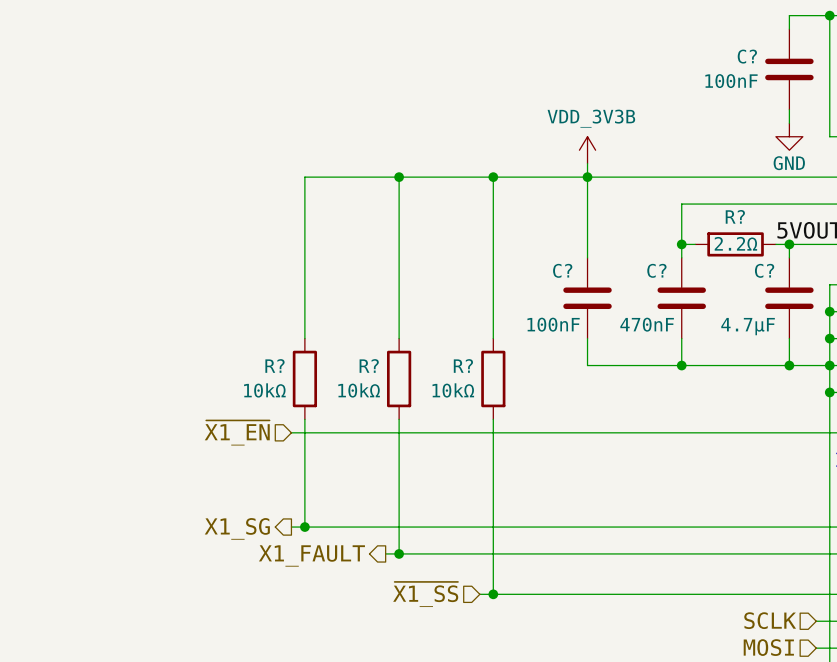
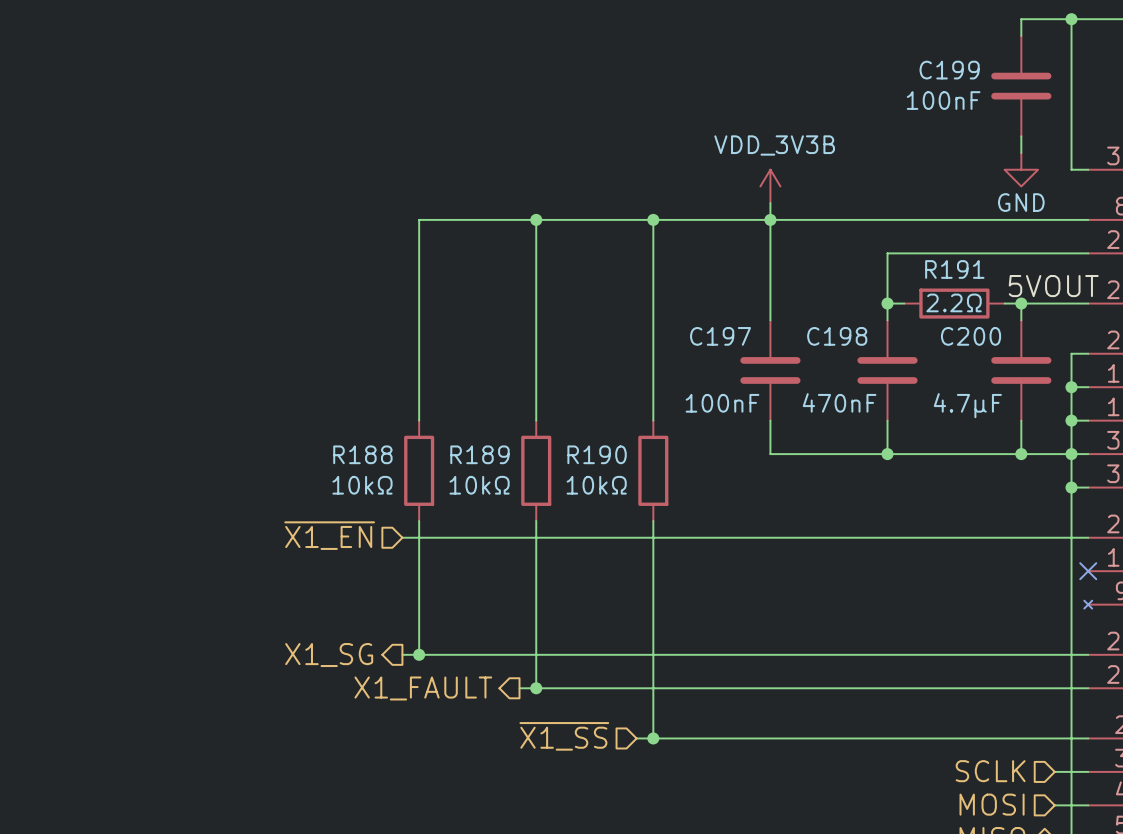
C? name: C? (747, 56) -> C199 (949, 70)
R? name: R? (735, 216) -> R191 (954, 269)
C? name: C? (562, 270) -> C197 (720, 336)
C? name: C? (656, 270) -> C198 (837, 336)
C? name: C? (764, 270) -> C200 (971, 336)
R? name: R? (274, 365) -> R188 (362, 454)
R? name: R? (369, 365) -> R189 (479, 454)
R? name: R? (463, 365) -> R190 (597, 454)

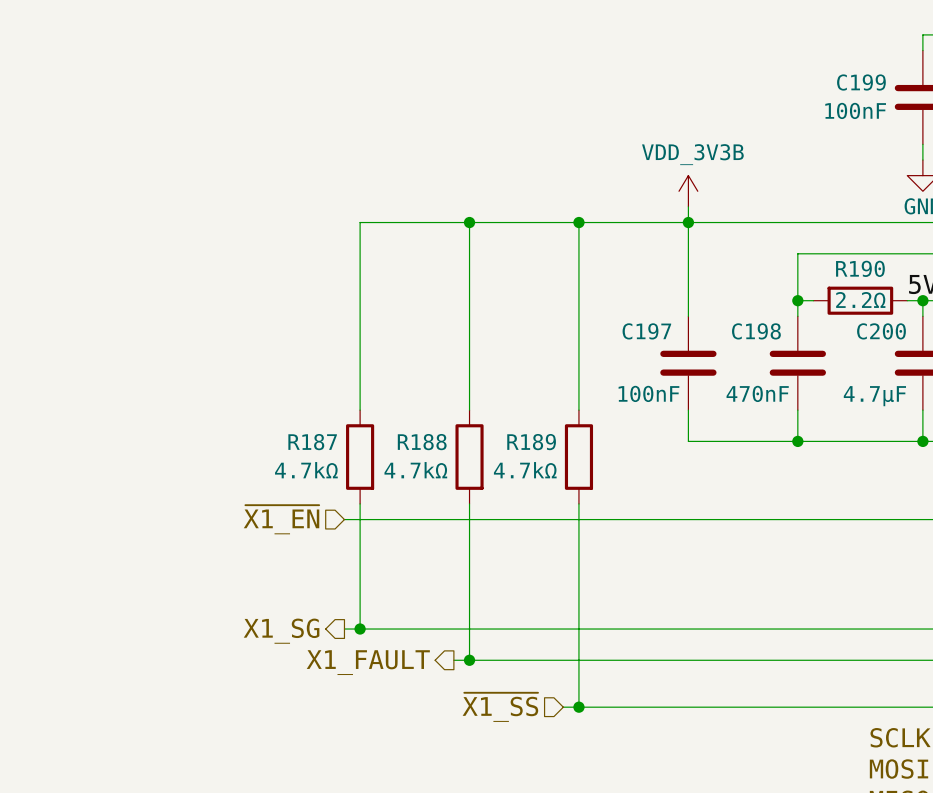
R191 name: R191 (954, 269) -> R190 (860, 268)
R188 name: R188 (362, 454) -> R187 (312, 442)
R189 name: R189 (479, 454) -> R188 (422, 442)
R190 name: R190 (597, 454) -> R189 (531, 442)
R188 value: 10kΩ (362, 485) -> 4.7kΩ (306, 470)
R189 value: 10kΩ (479, 485) -> 4.7kΩ (415, 470)
R190 value: 10kΩ (596, 485) -> 4.7kΩ (525, 470)

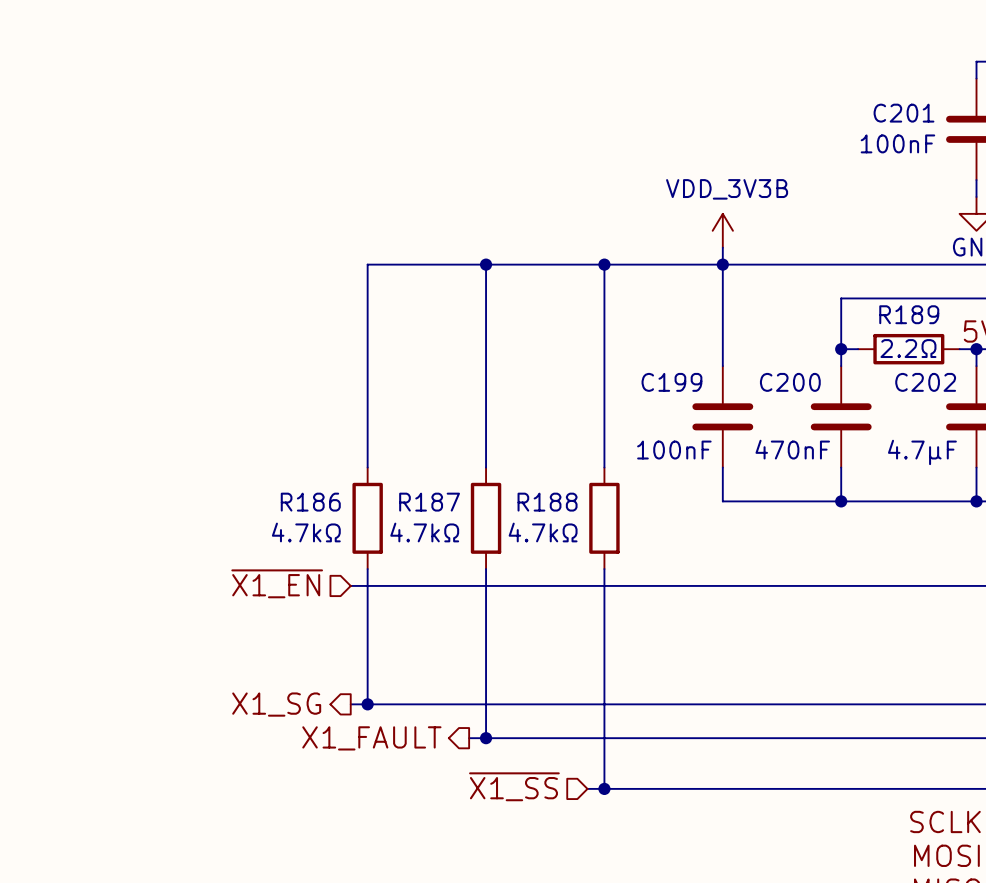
C199 name: C199 (861, 82) -> C201 (903, 113)
R190 name: R190 (860, 268) -> R189 (909, 314)
C197 name: C197 (646, 331) -> C199 (671, 382)
C198 name: C198 (756, 331) -> C200 (790, 382)
C200 name: C200 (881, 331) -> C202 (925, 382)
R187 name: R187 (312, 442) -> R186 (310, 502)
R188 name: R188 (422, 442) -> R187 (429, 502)
R189 name: R189 (531, 442) -> R188 (547, 502)

